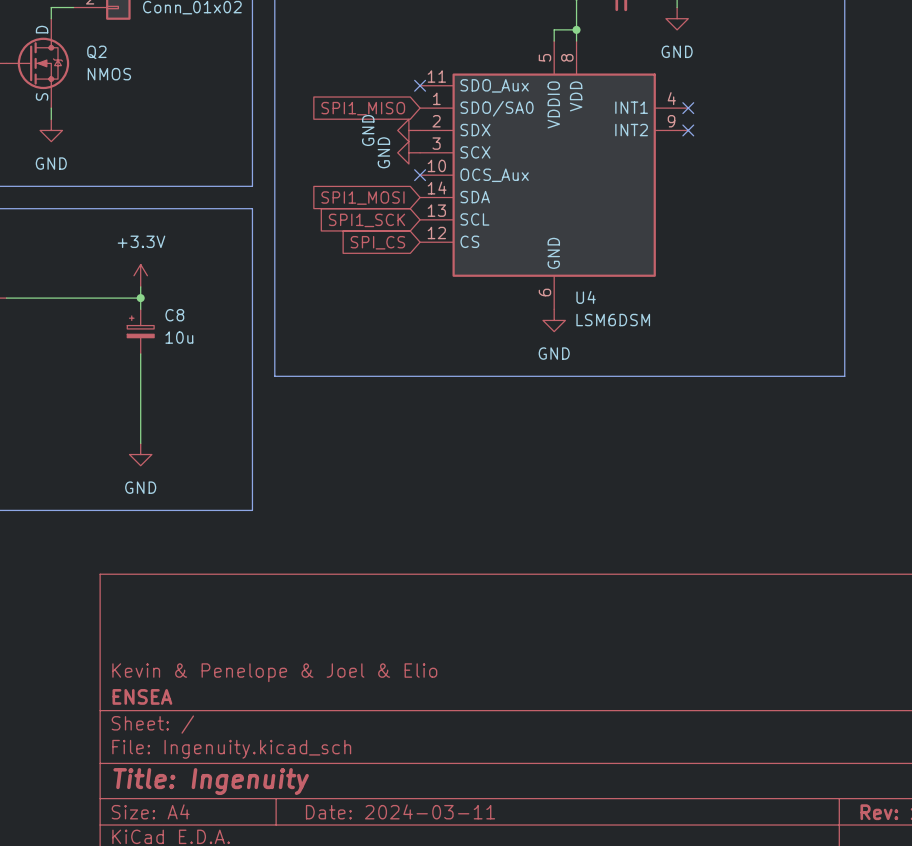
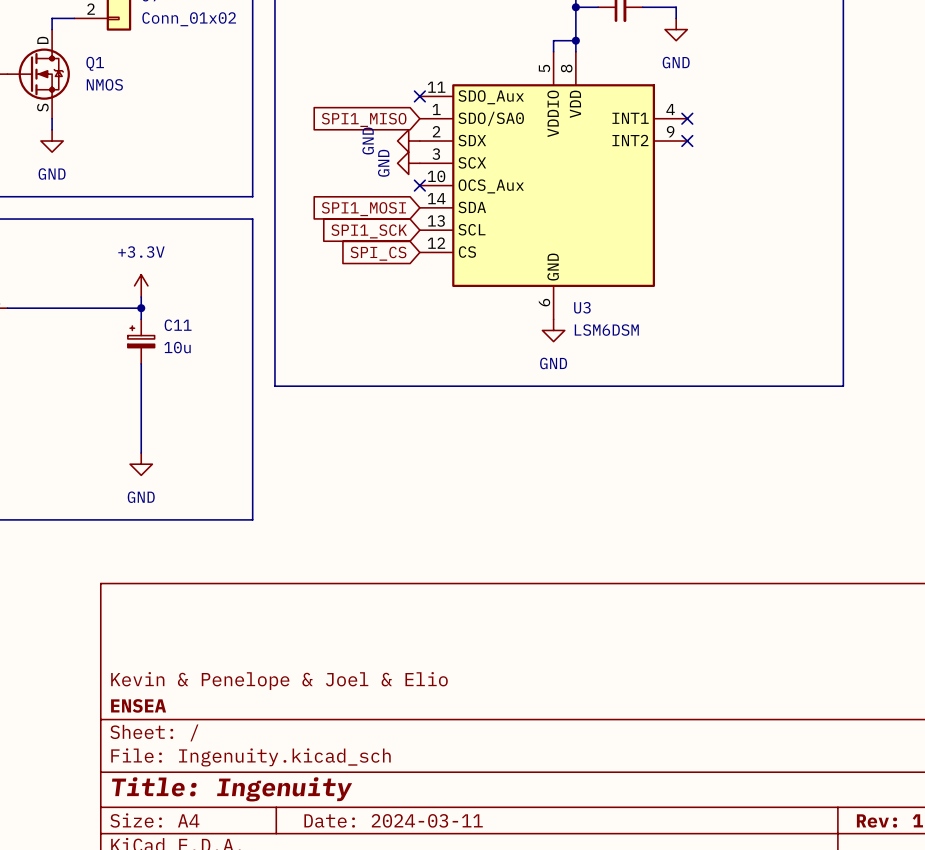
Q2 name: Q2 (96, 52) -> Q1 (95, 63)
U4 name: U4 (586, 297) -> U3 (582, 307)
C8 name: C8 (174, 315) -> C11 (178, 325)

